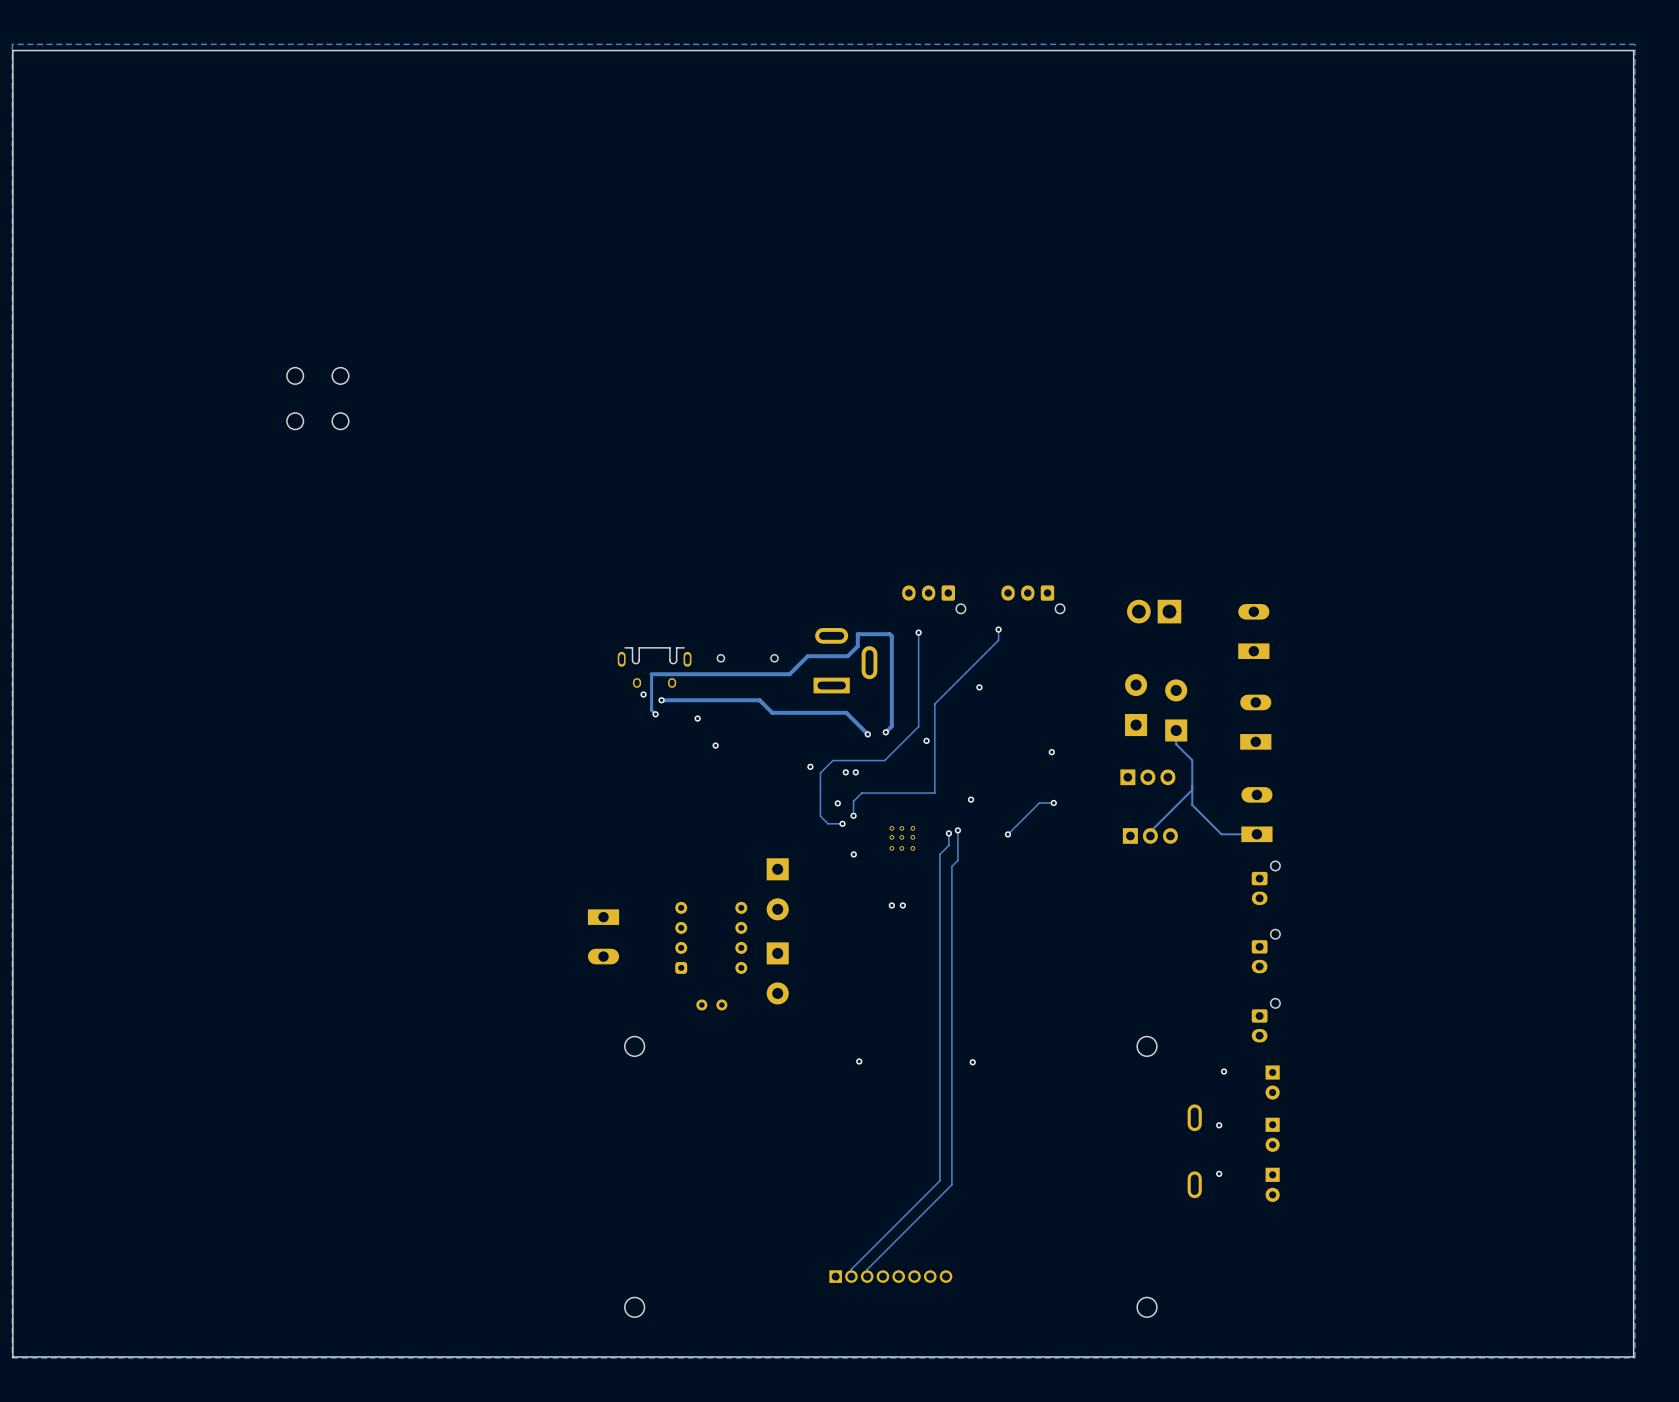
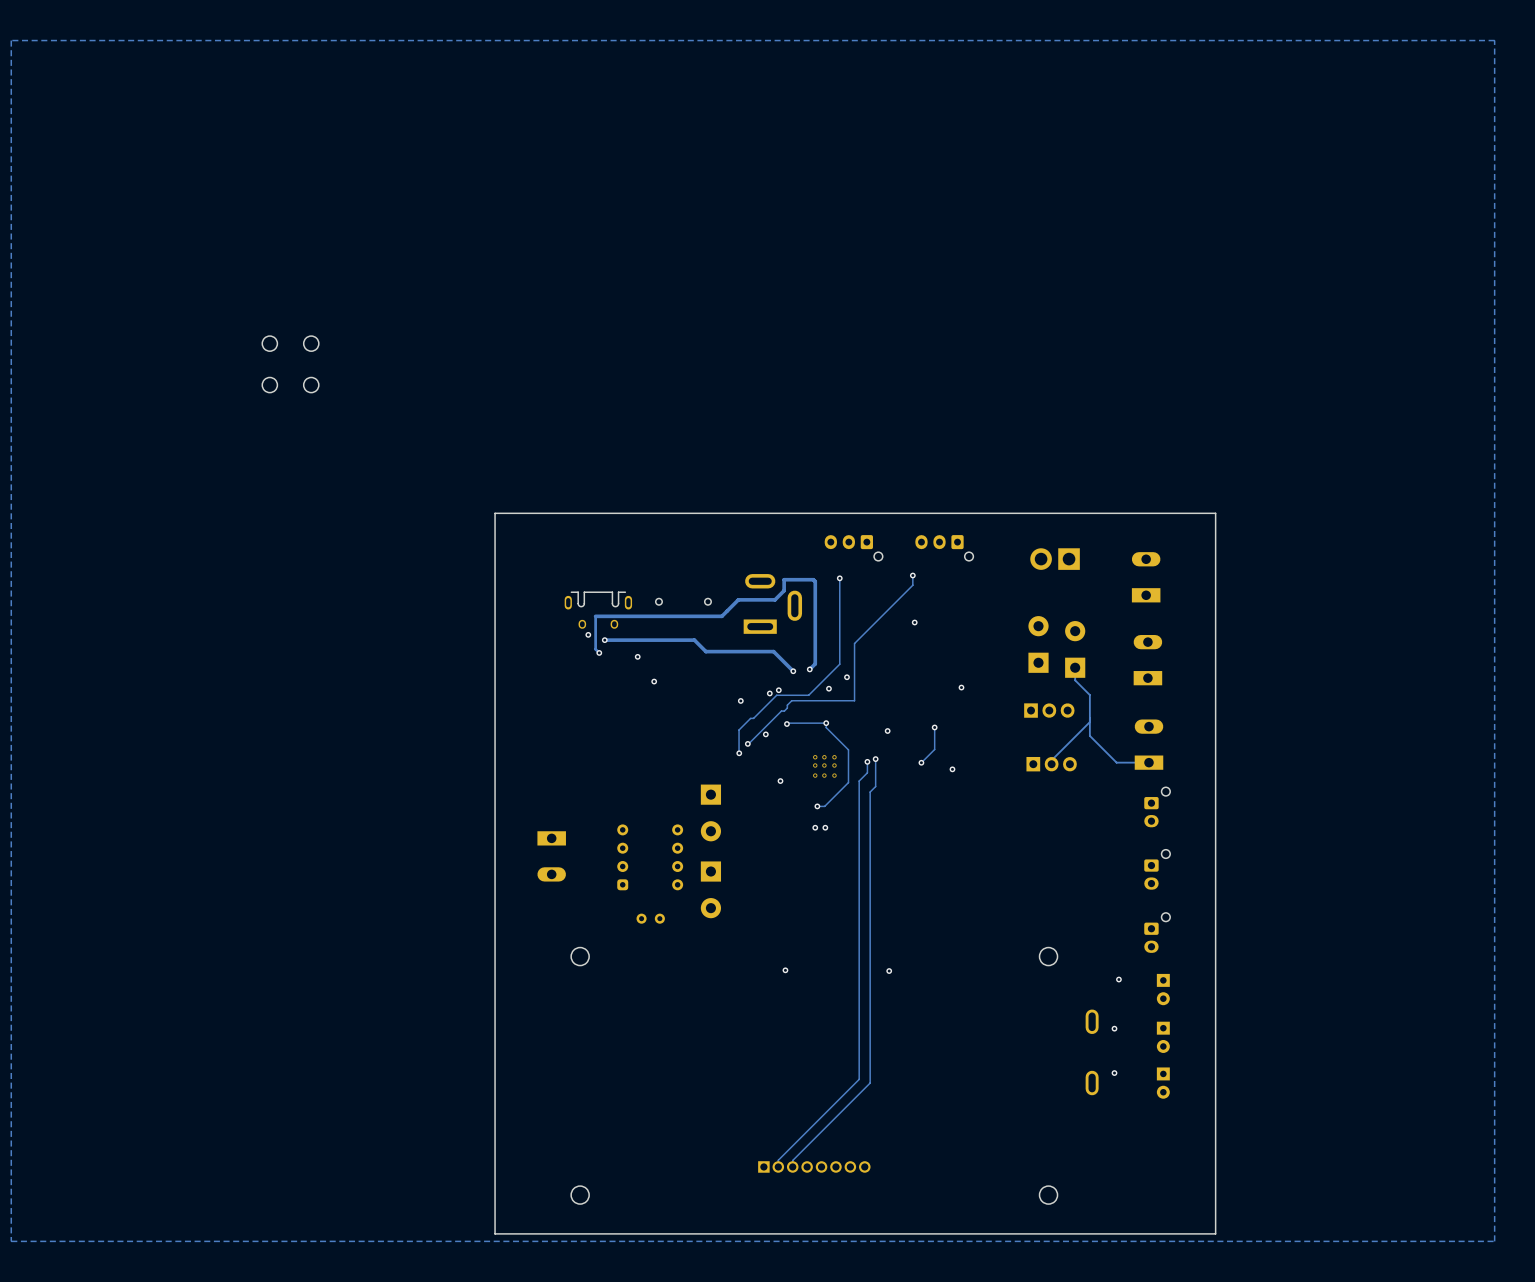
board edge: (1633, 50) (12, 50) (12, 1357) (1633, 1357) (1633, 50) -> none
board edge: none -> (1215, 513) (495, 513) (495, 1233) (1215, 1233) (1215, 513)
via position: (979, 687) -> (914, 622)
via: none -> (828, 688)
via: none -> (778, 690)
via: none -> (769, 693)
track: (849, 760) (832, 760) (820, 773) (820, 816) (828, 823) (842, 823) -> (776, 695) (753, 718) (750, 718)
track: (934, 766) (934, 793) (861, 793) (853, 801) (853, 815) -> (854, 700) (791, 700) (784, 711) (781, 711) (747, 743)
via: (845, 772) -> none
via: (855, 772) -> none
track: none -> (750, 718) (739, 730) (739, 753)
via: none -> (826, 723)
track: none -> (786, 724) (826, 723) (826, 727) (848, 749) (848, 782) (824, 806) (817, 806)
via: none -> (786, 724)
via: none -> (934, 727)
track: (1053, 802) (1039, 802) (1022, 819) -> (934, 727) (934, 749)
via: (1053, 802) -> none
via: none -> (747, 743)
via: (853, 815) -> none
via: (842, 823) -> none
via: none -> (739, 753)
via: none -> (952, 769)
via: none -> (817, 806)

